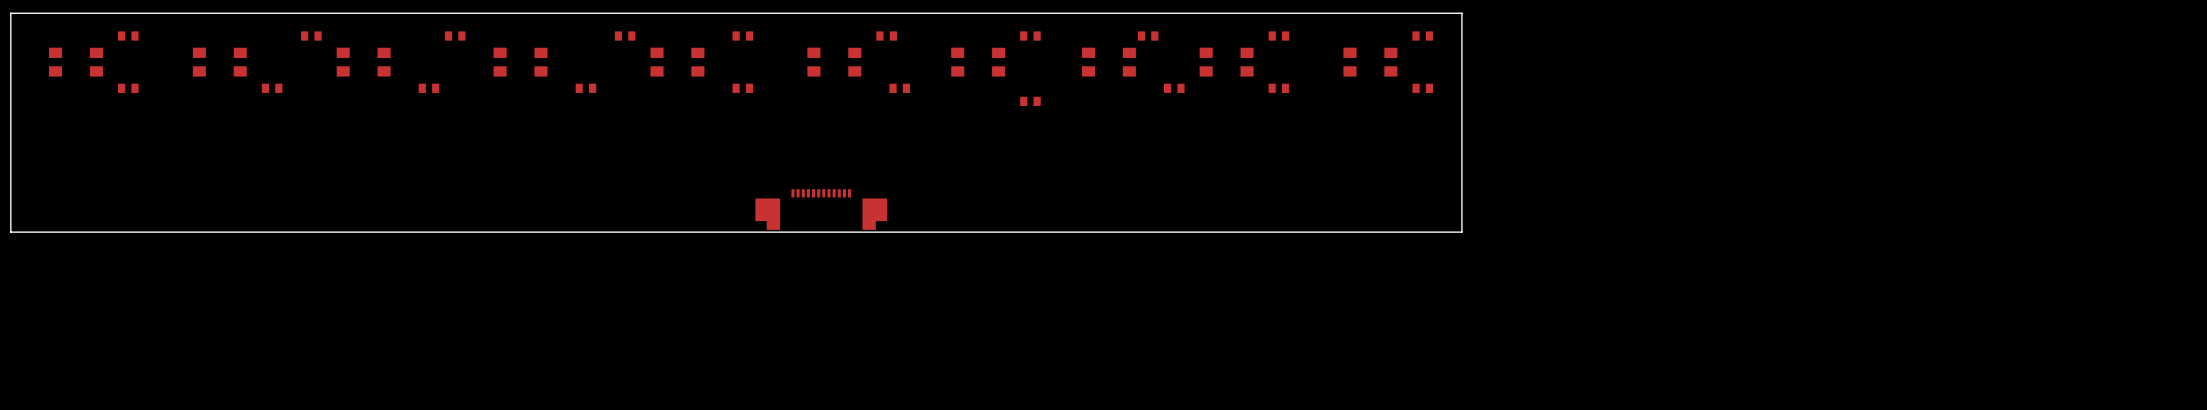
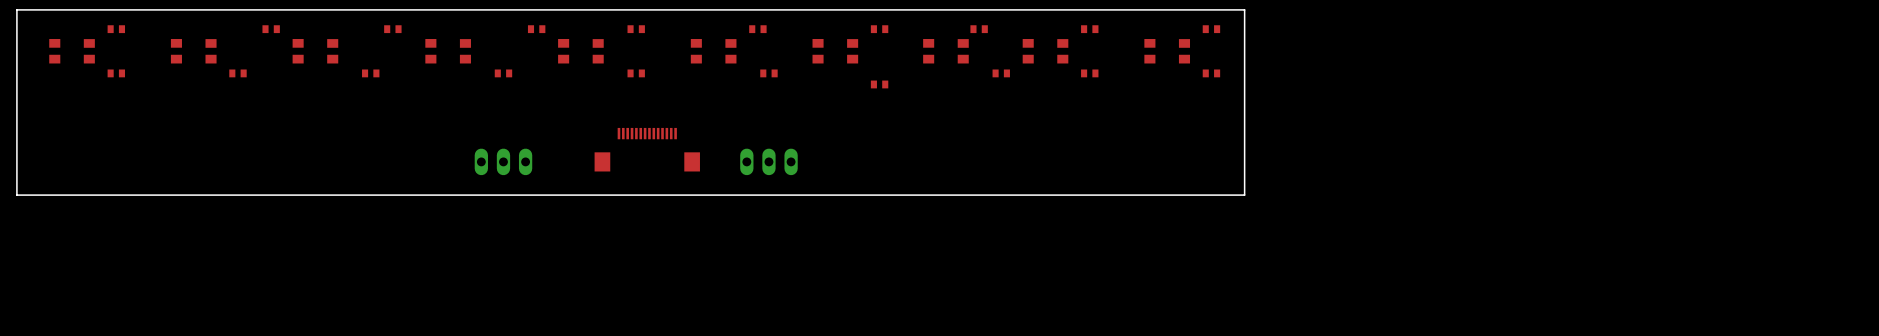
part: none -> (647, 149)
part: none -> (503, 161)
part: none -> (768, 161)
part: (821, 209) -> none

